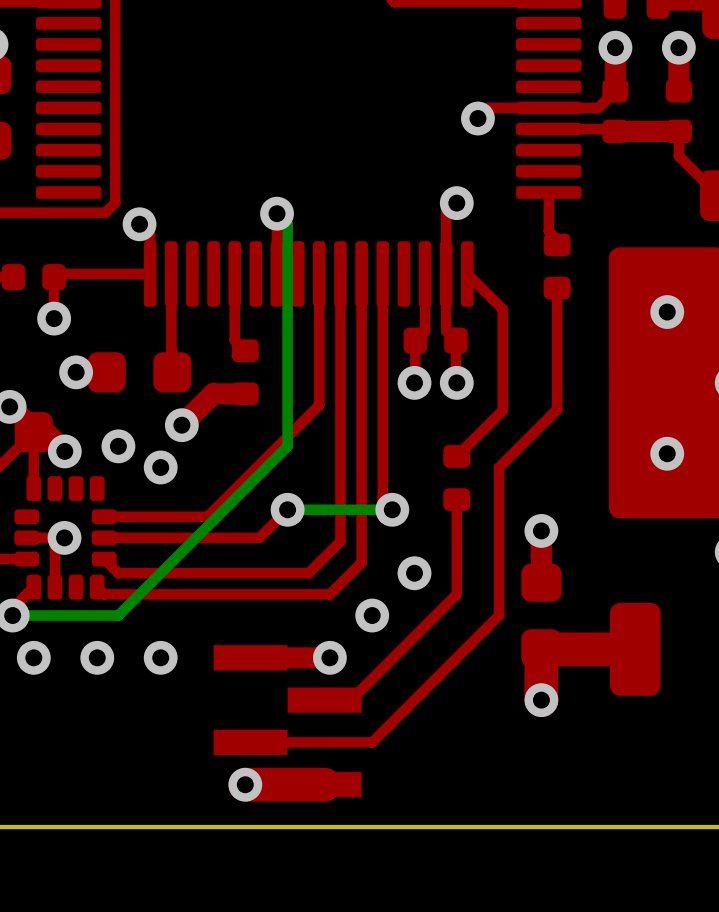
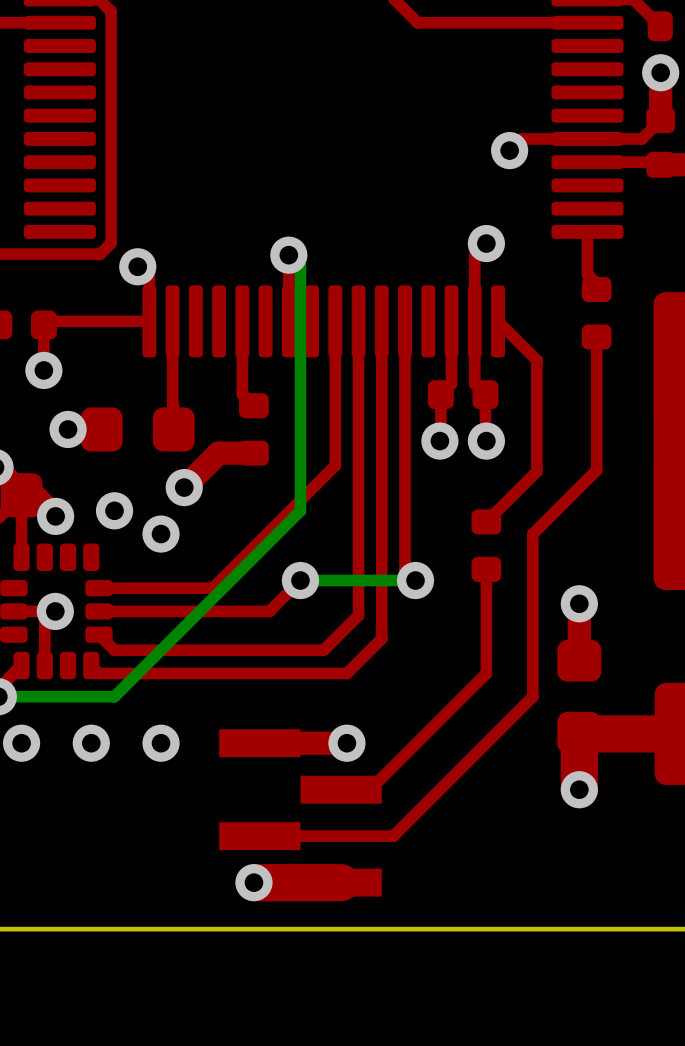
via: (414, 573) -> none
via: (372, 615) -> none

